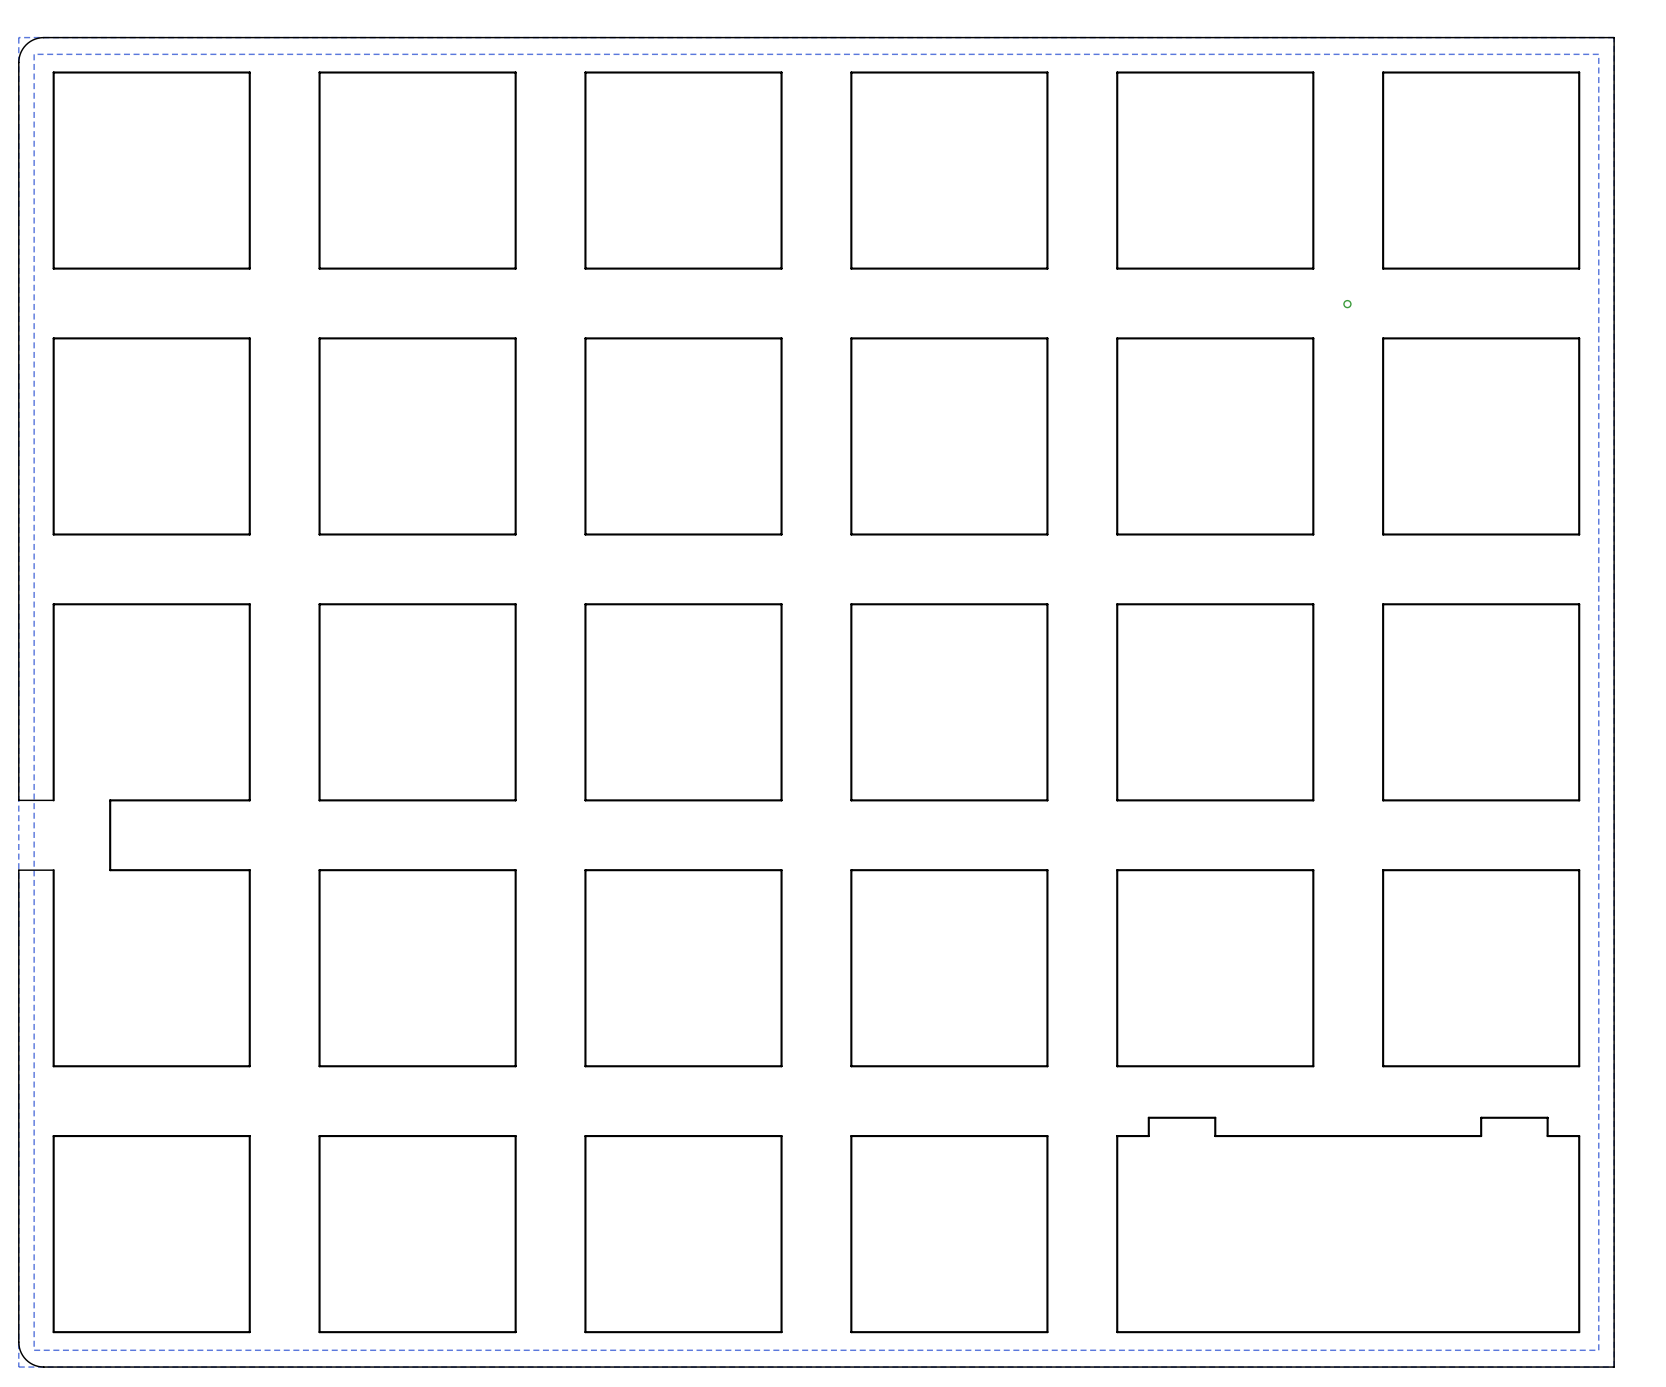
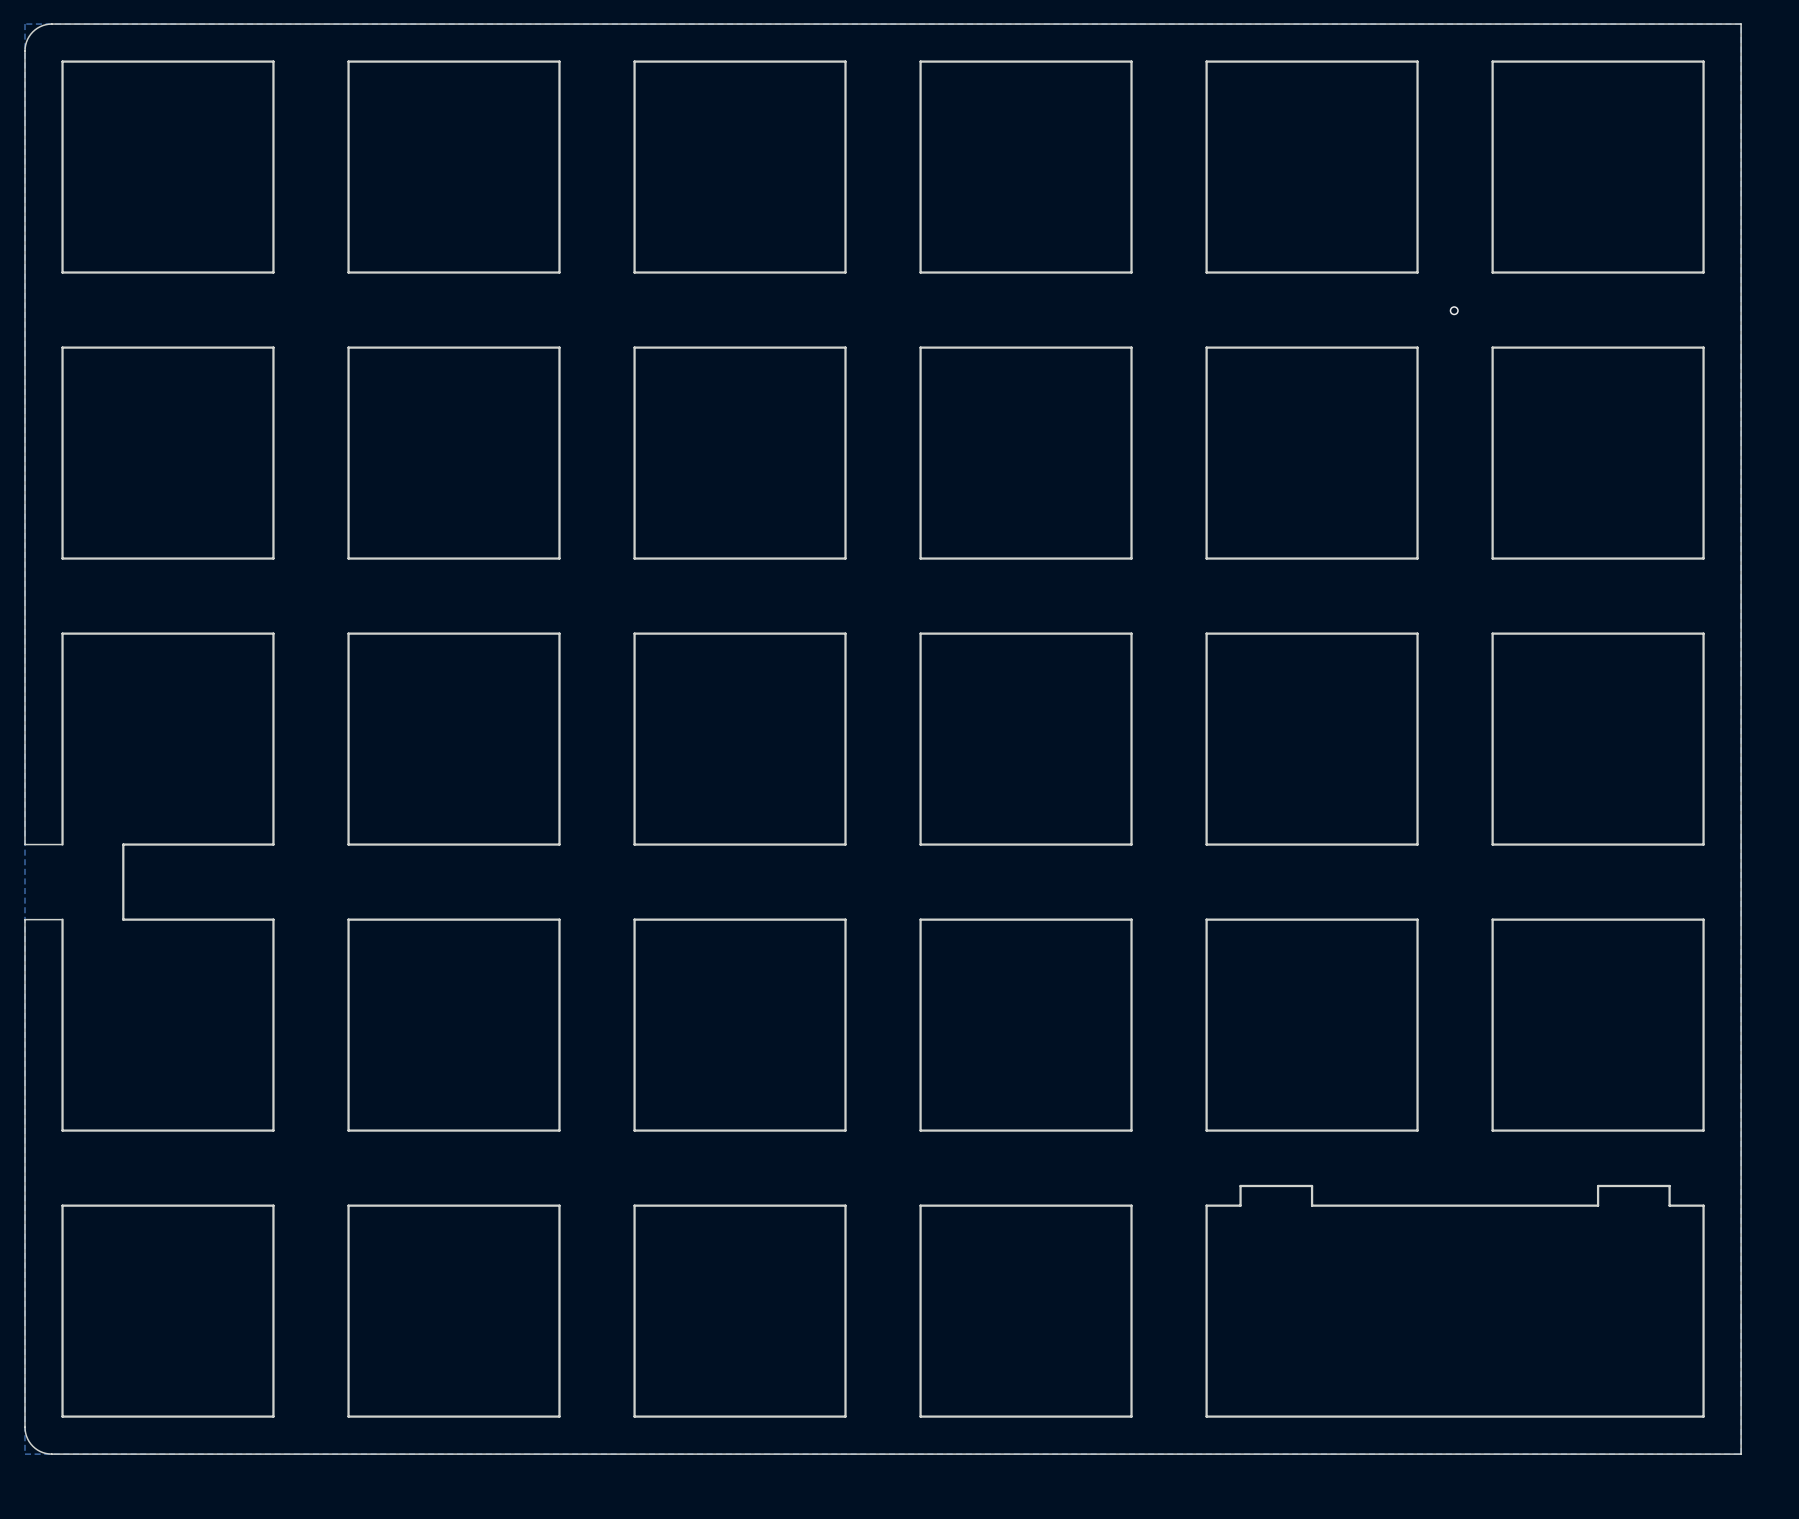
zone outline: (1598, 54) (1598, 1350) (34, 1350) (34, 54) (1598, 54) -> none

